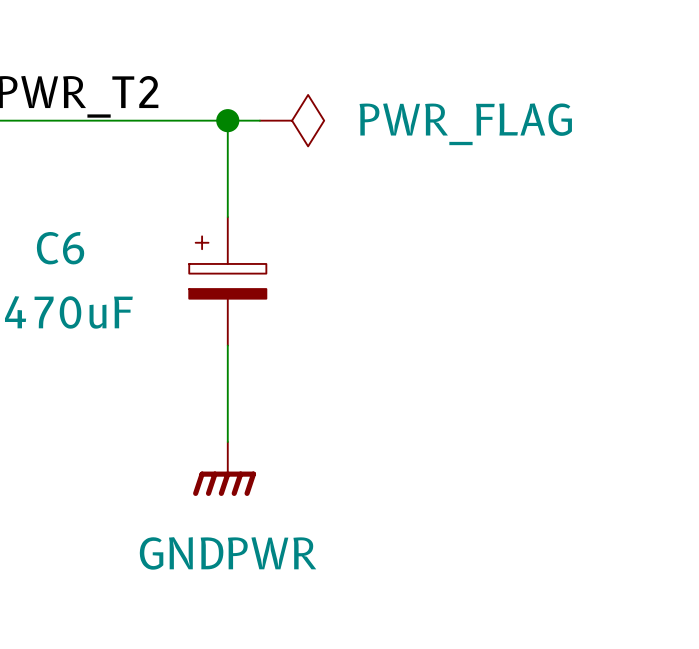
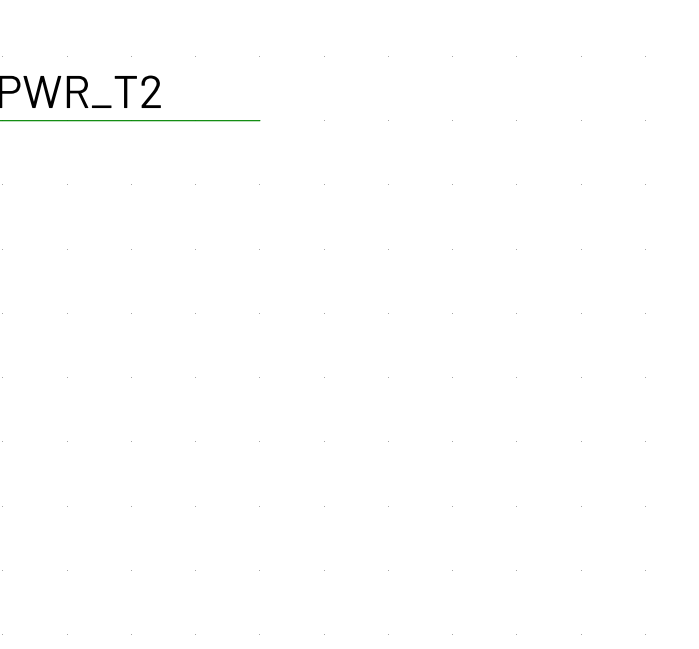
wire: (227, 120) (227, 217) -> none
junction: (227, 120) -> none
power symbol: PWR_FLAG (292, 120) -> none
C6: 470uF (227, 281) -> none
wire: (227, 345) (227, 441) -> none
power symbol: GNDPWR (224, 468) -> none

